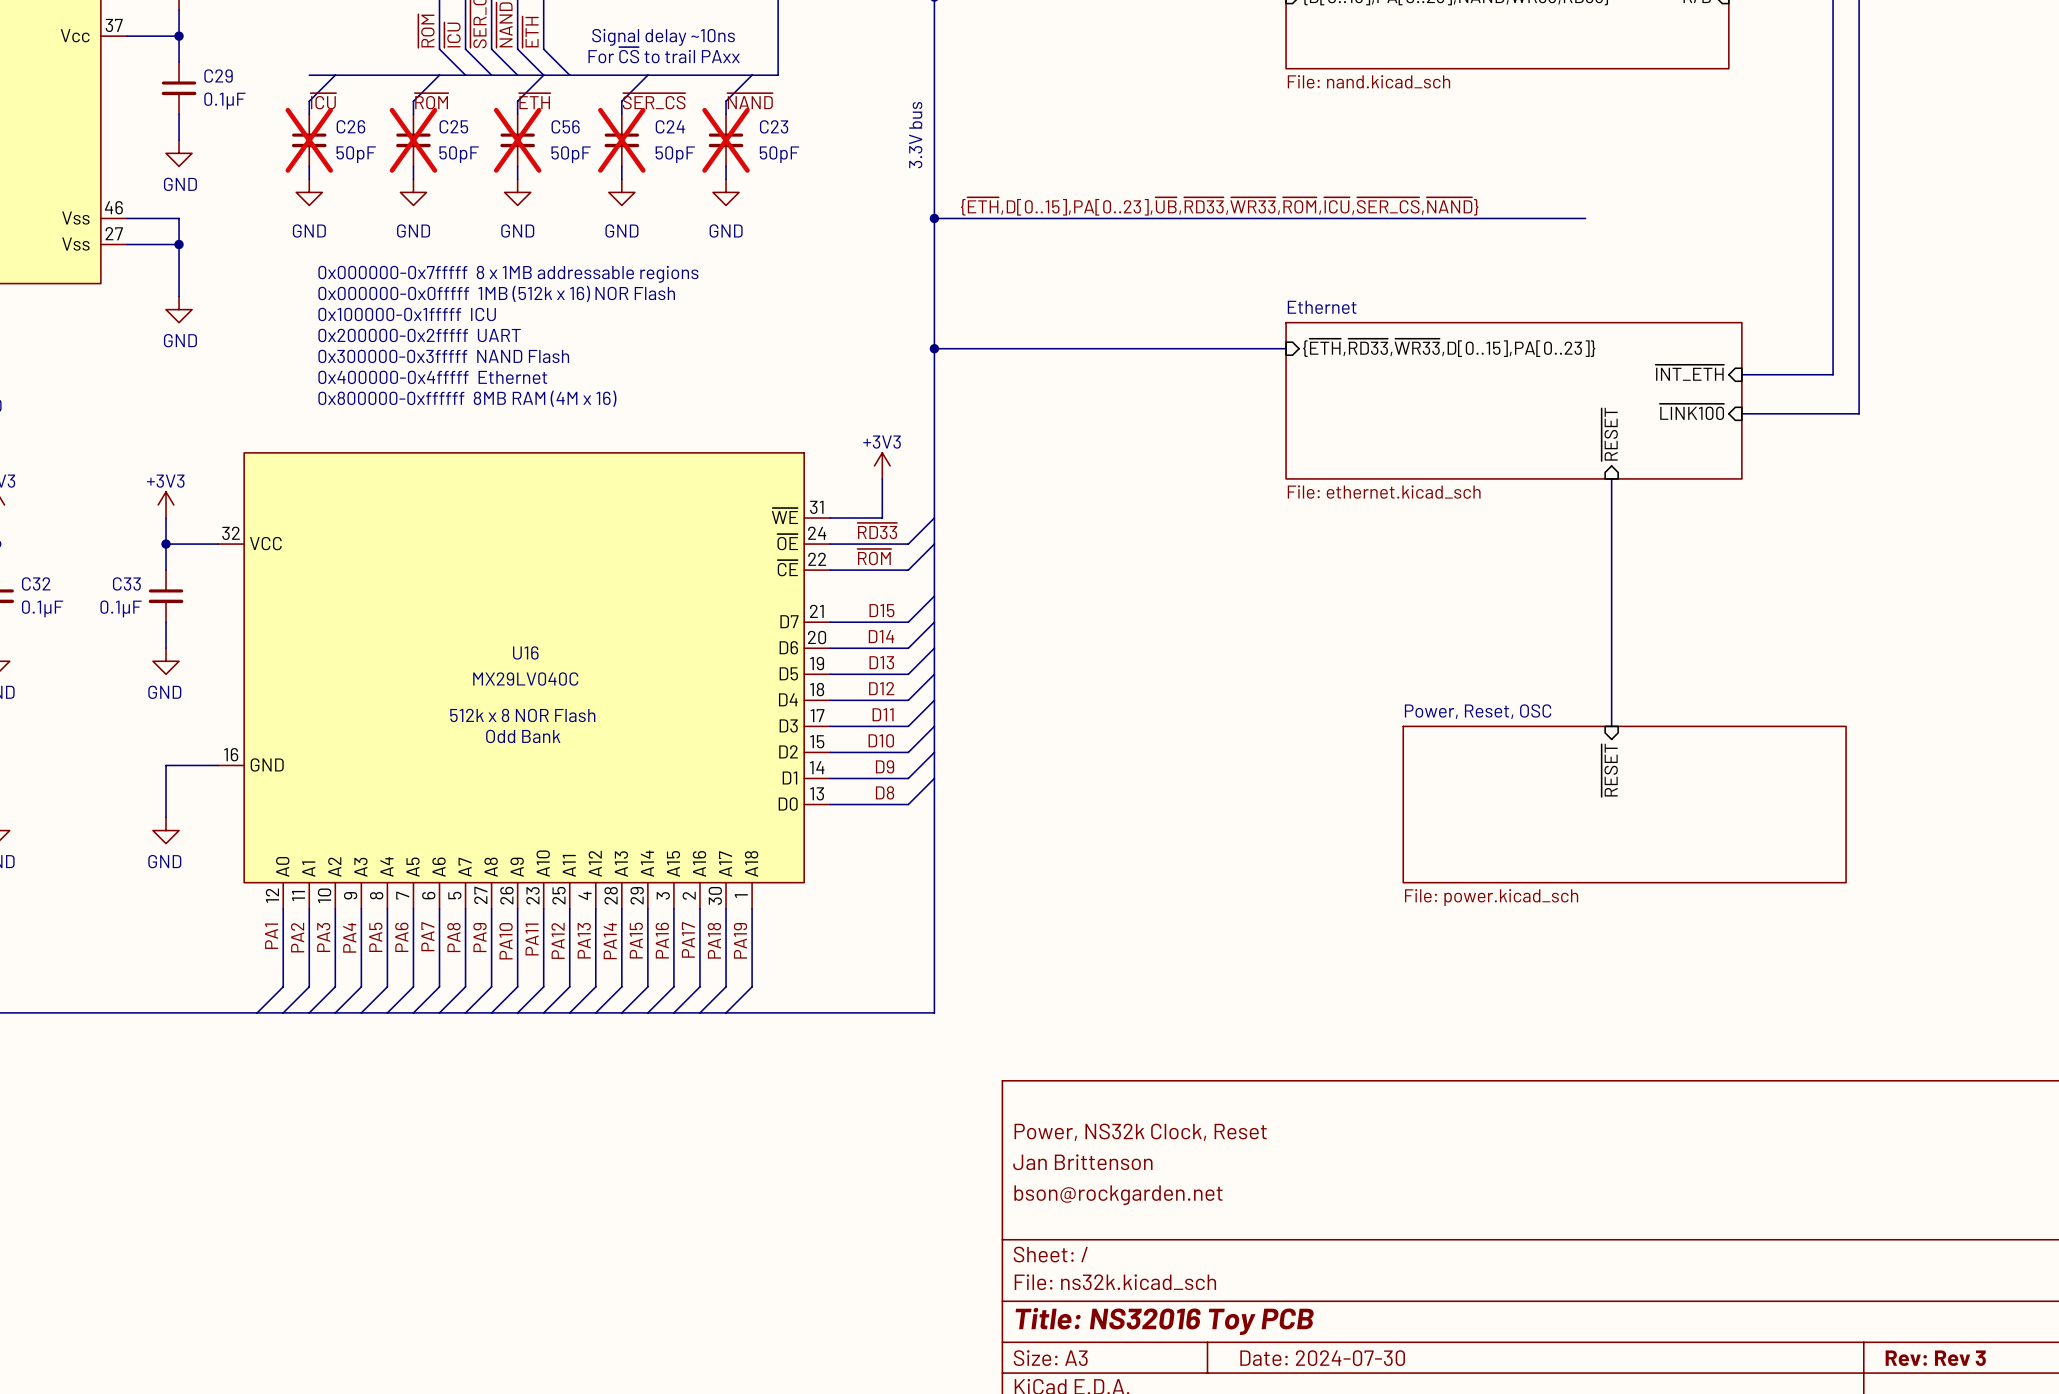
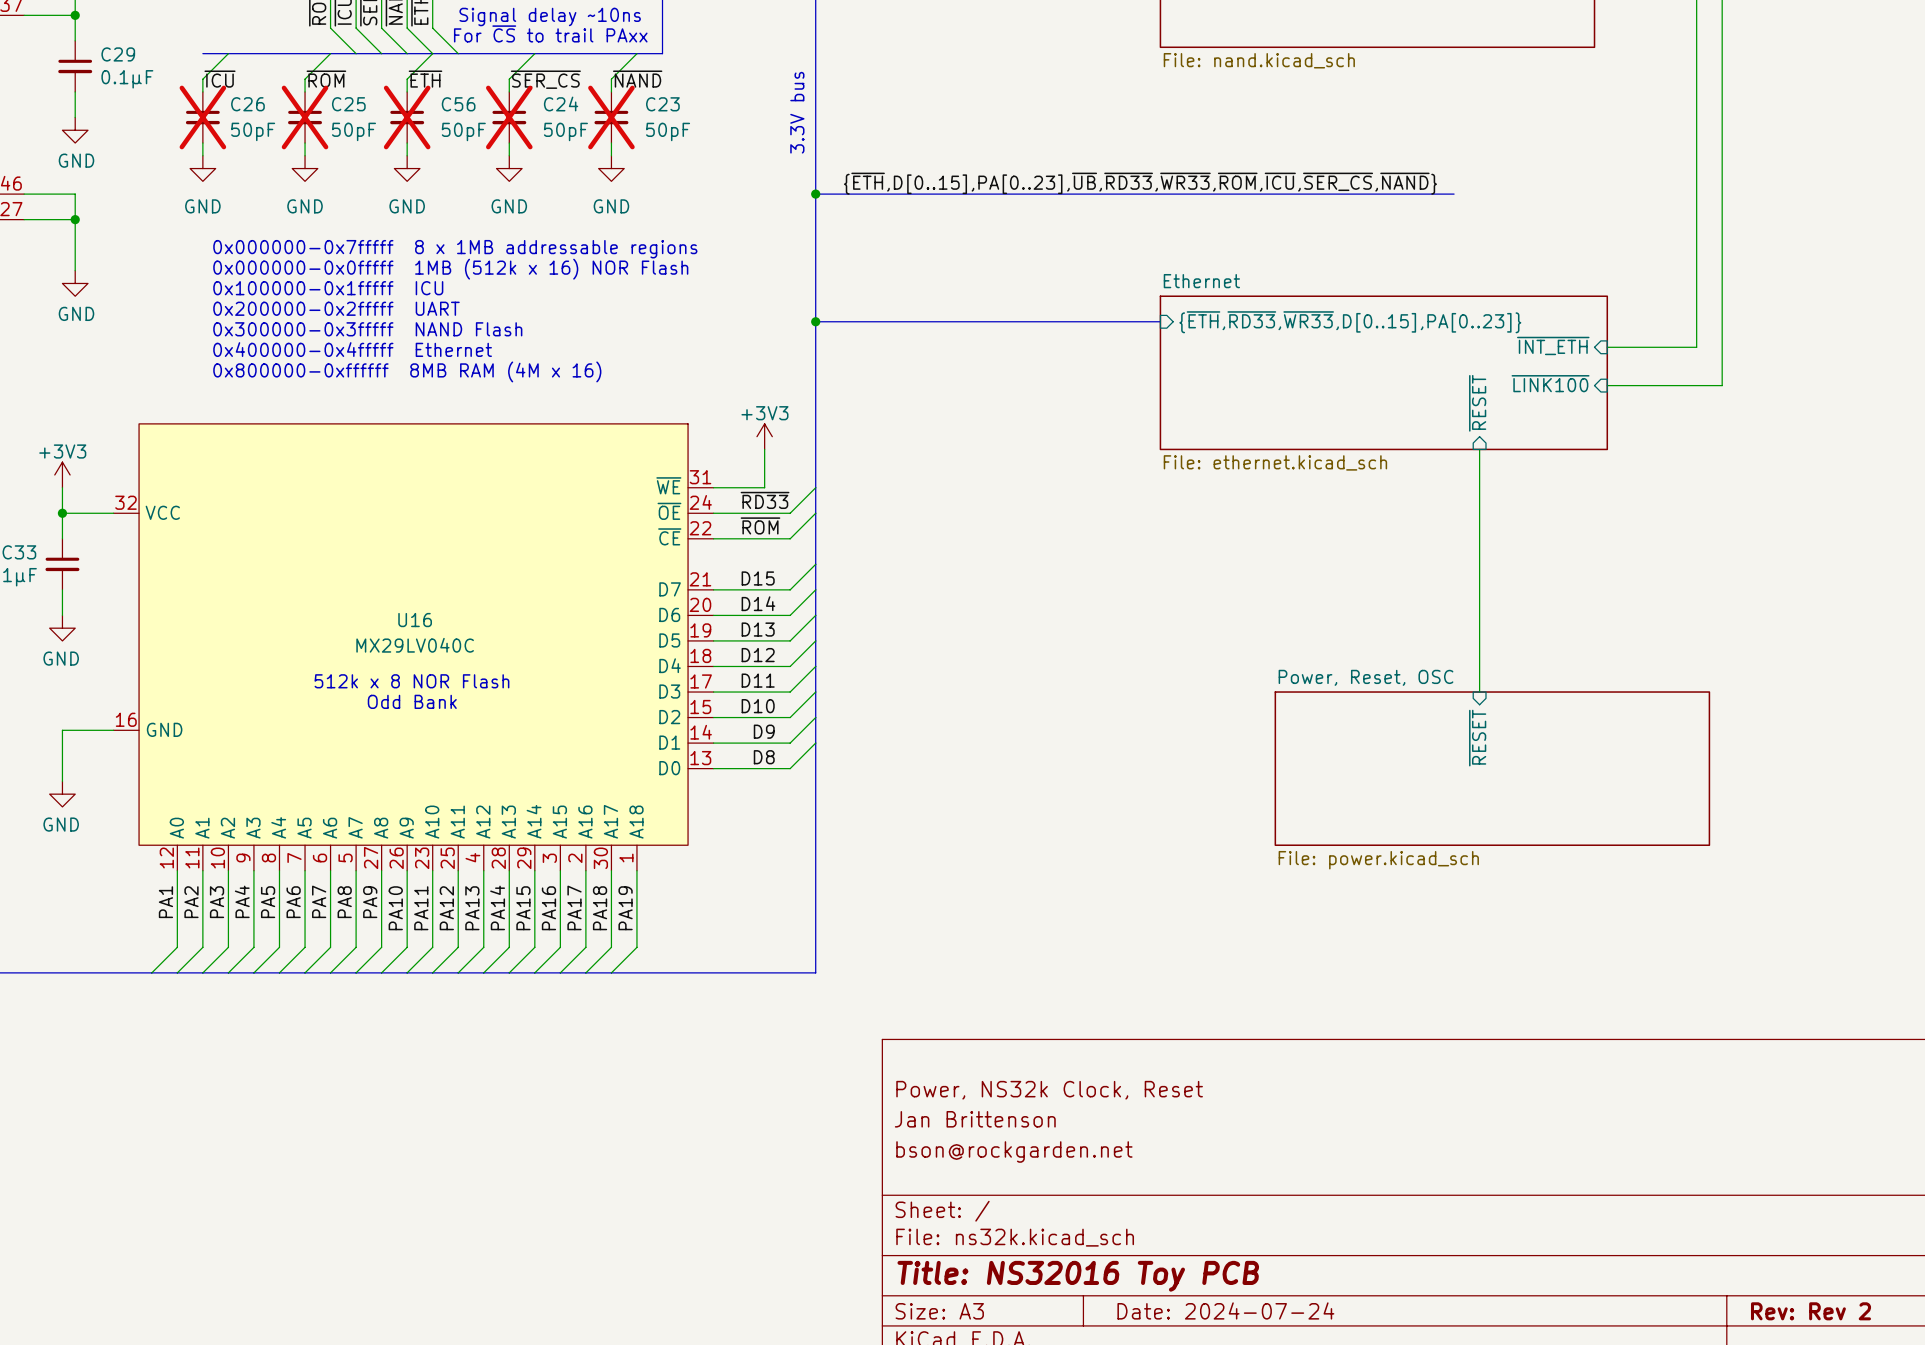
title block: Date: 2024-07-30 (1322, 1358) -> Date: 2024-07-24 (1225, 1310)
title block: Rev: Rev 3 (1935, 1358) -> Rev: Rev 2 (1811, 1311)

